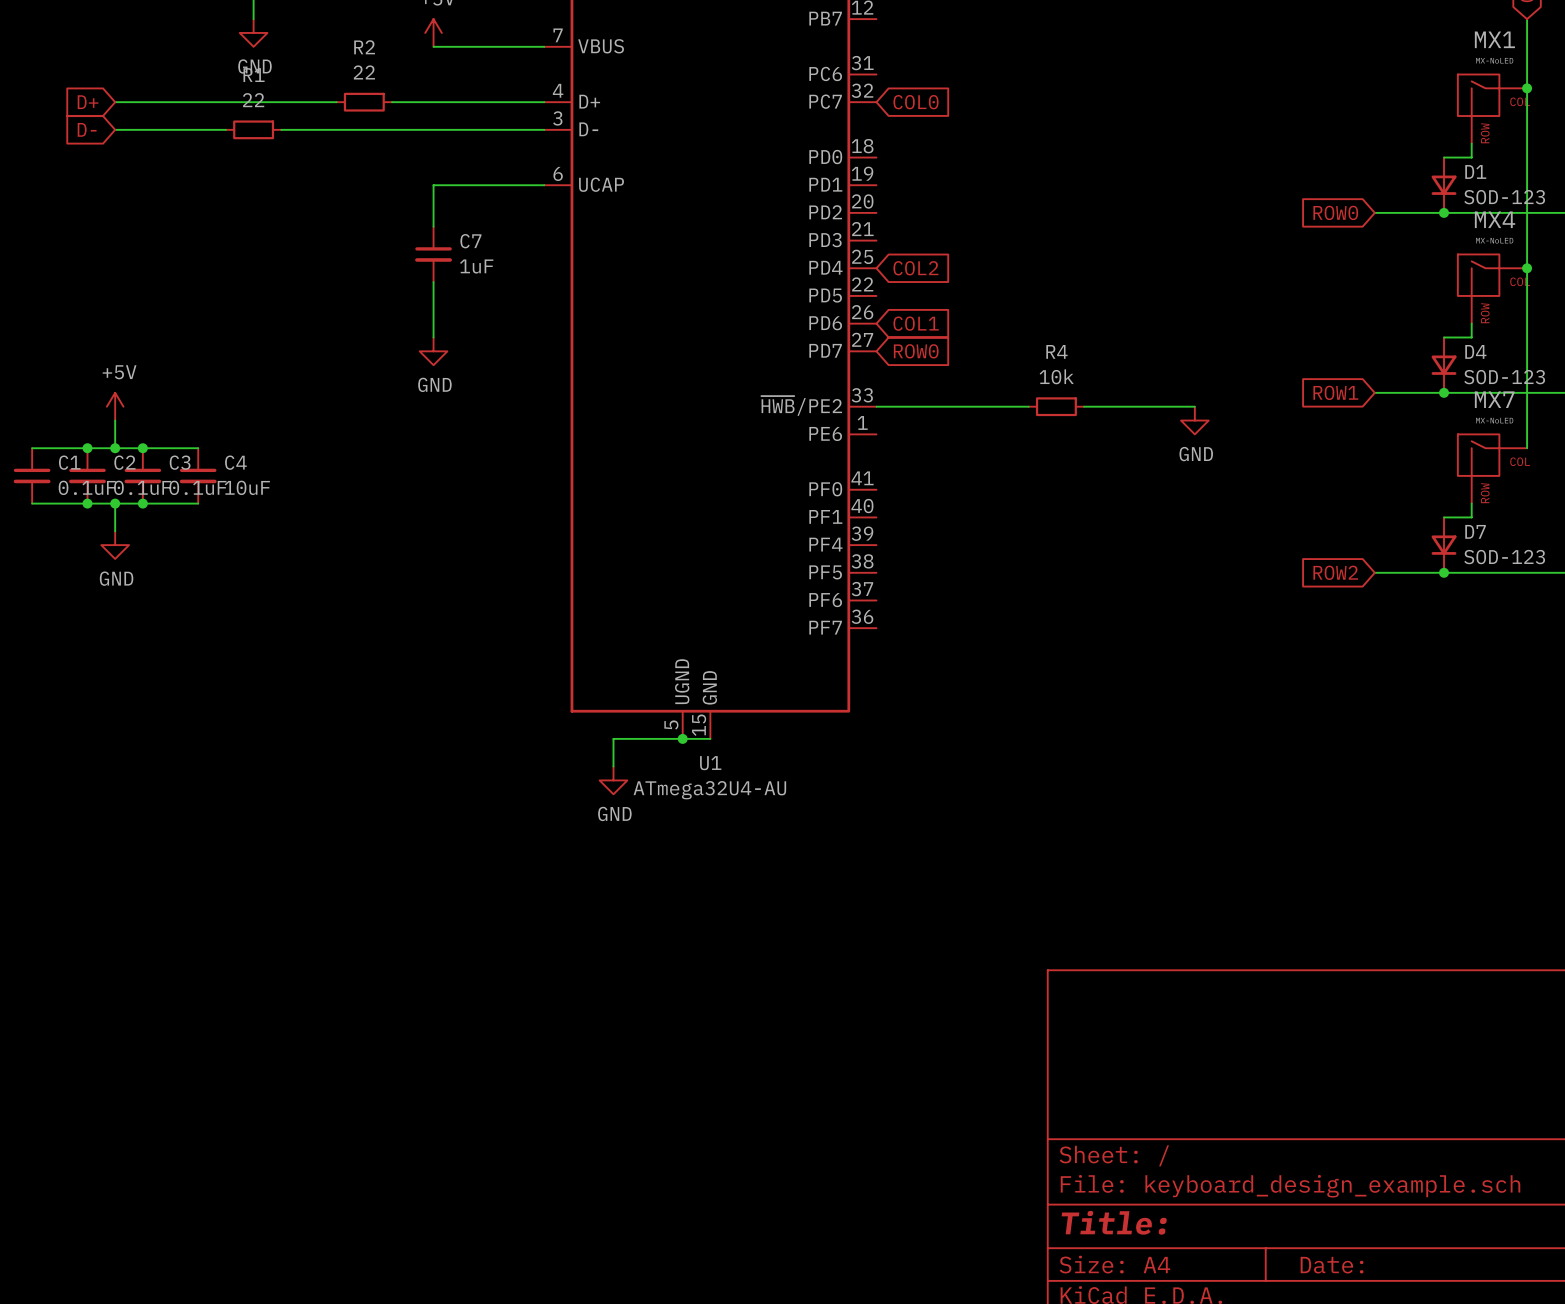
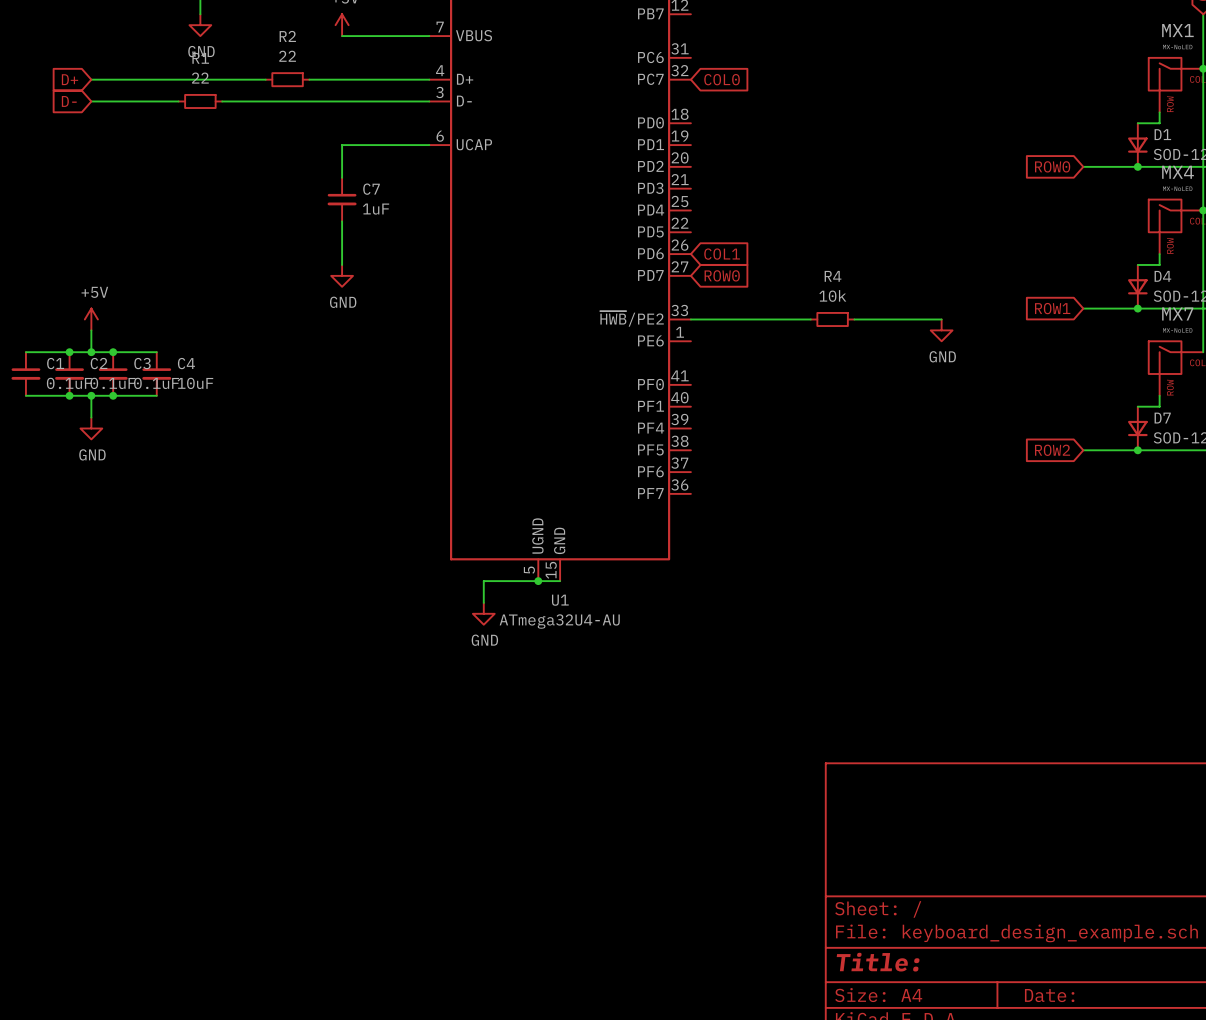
global label: COL2 (915, 268) -> none

